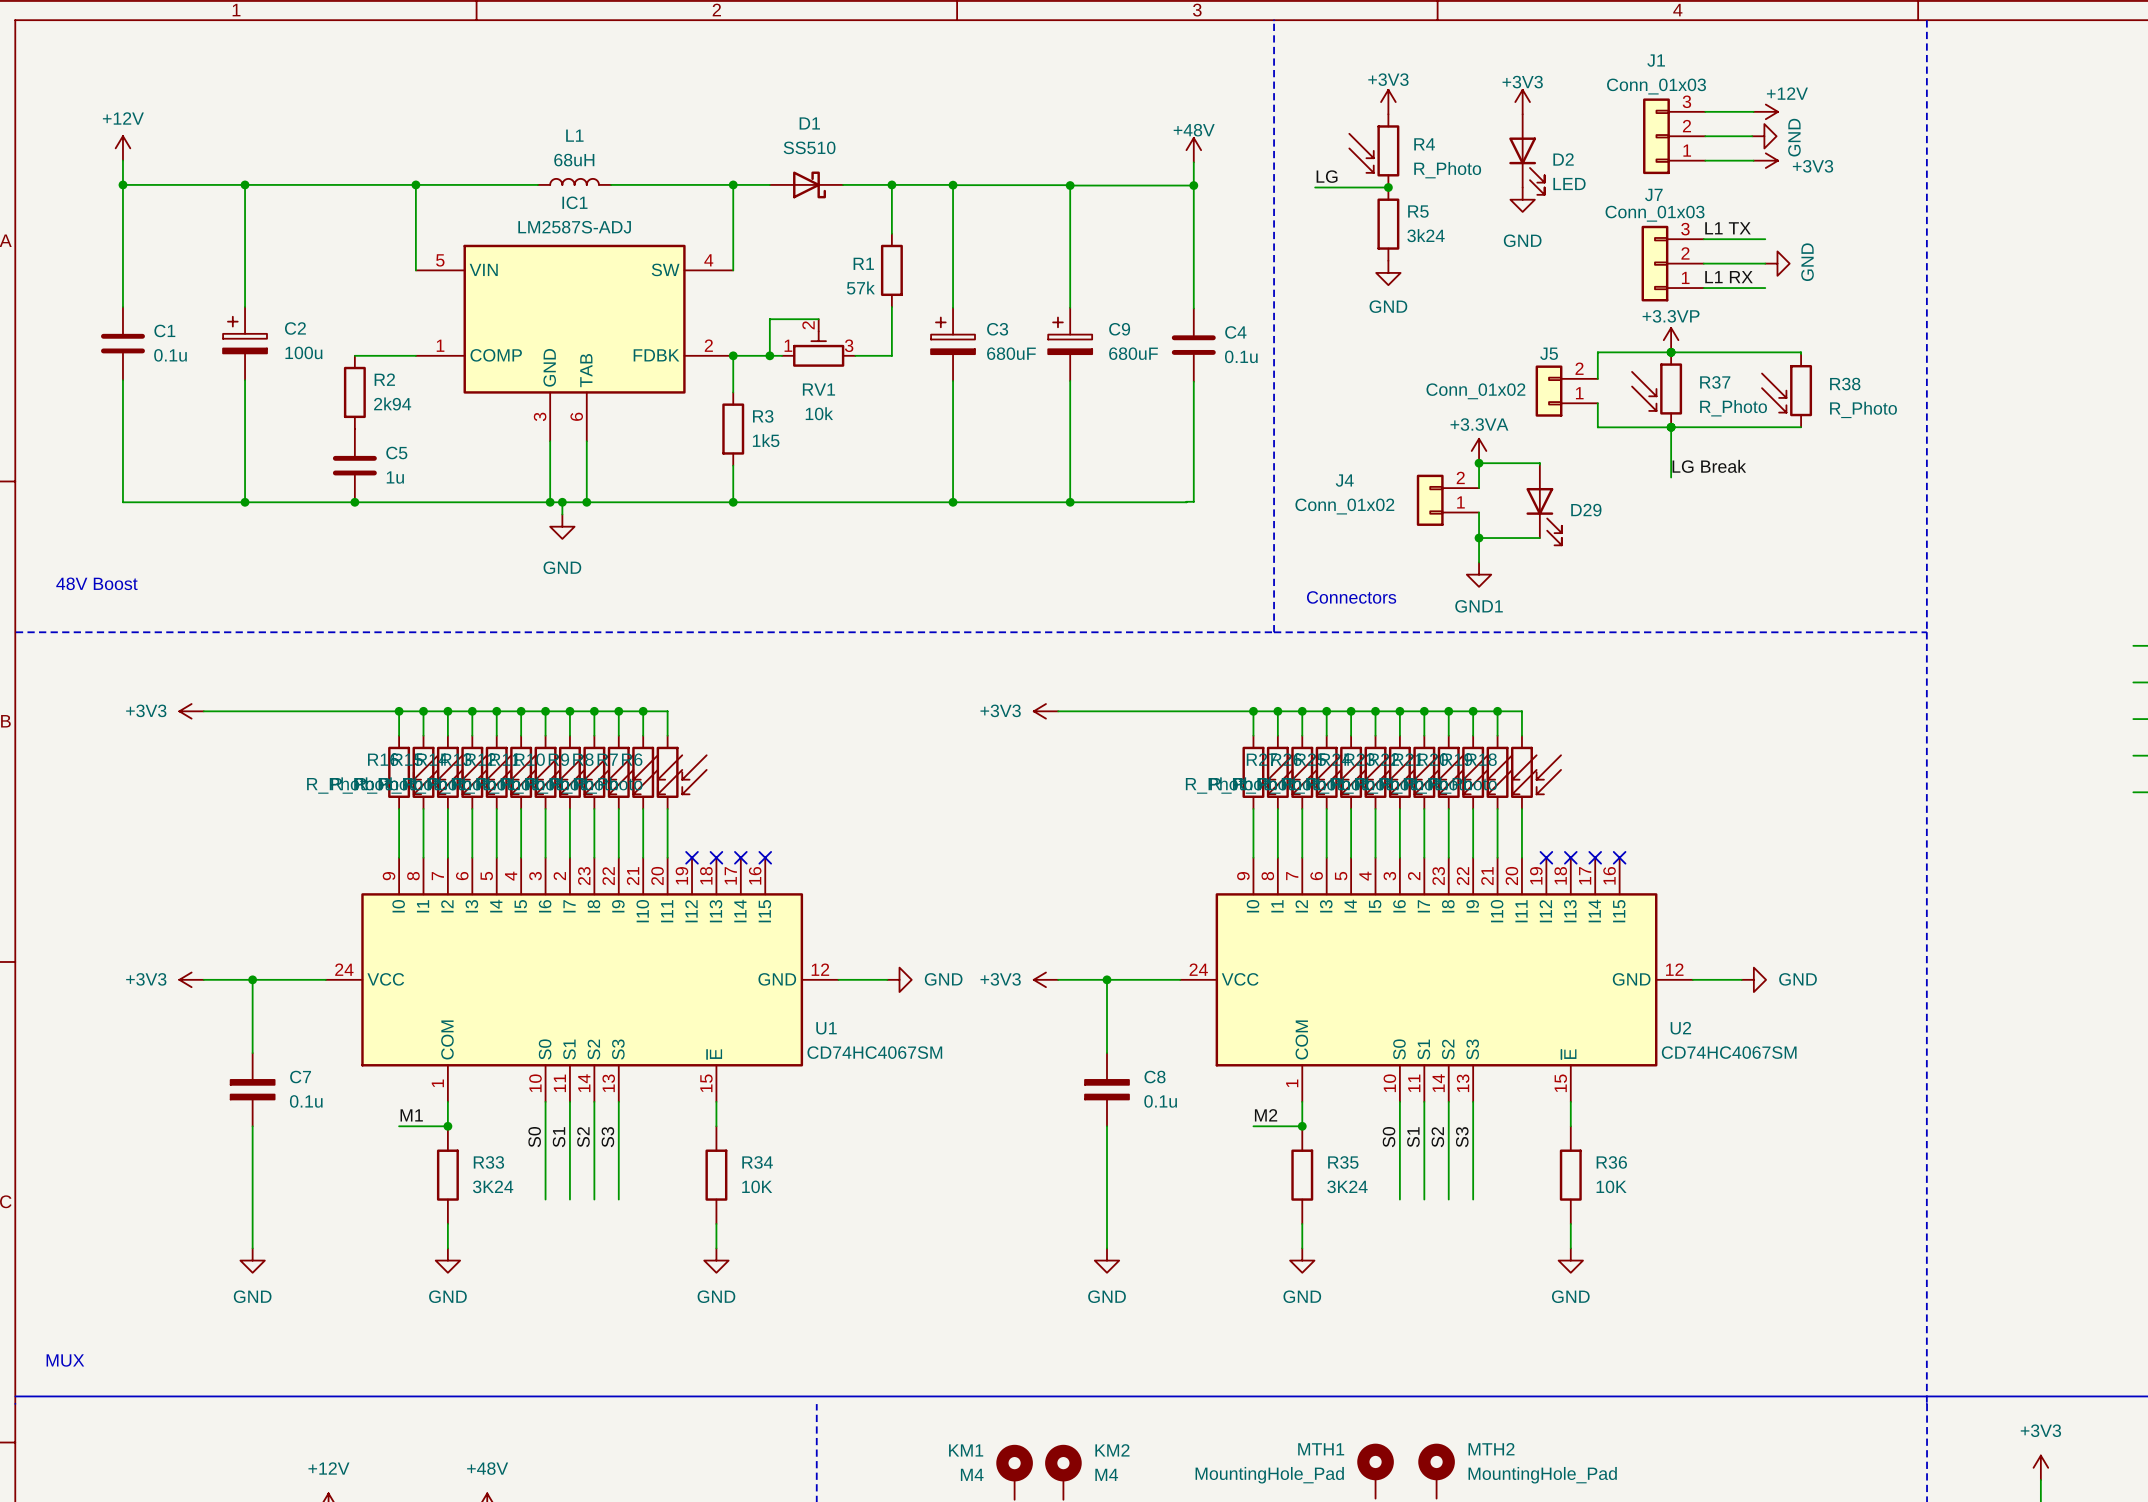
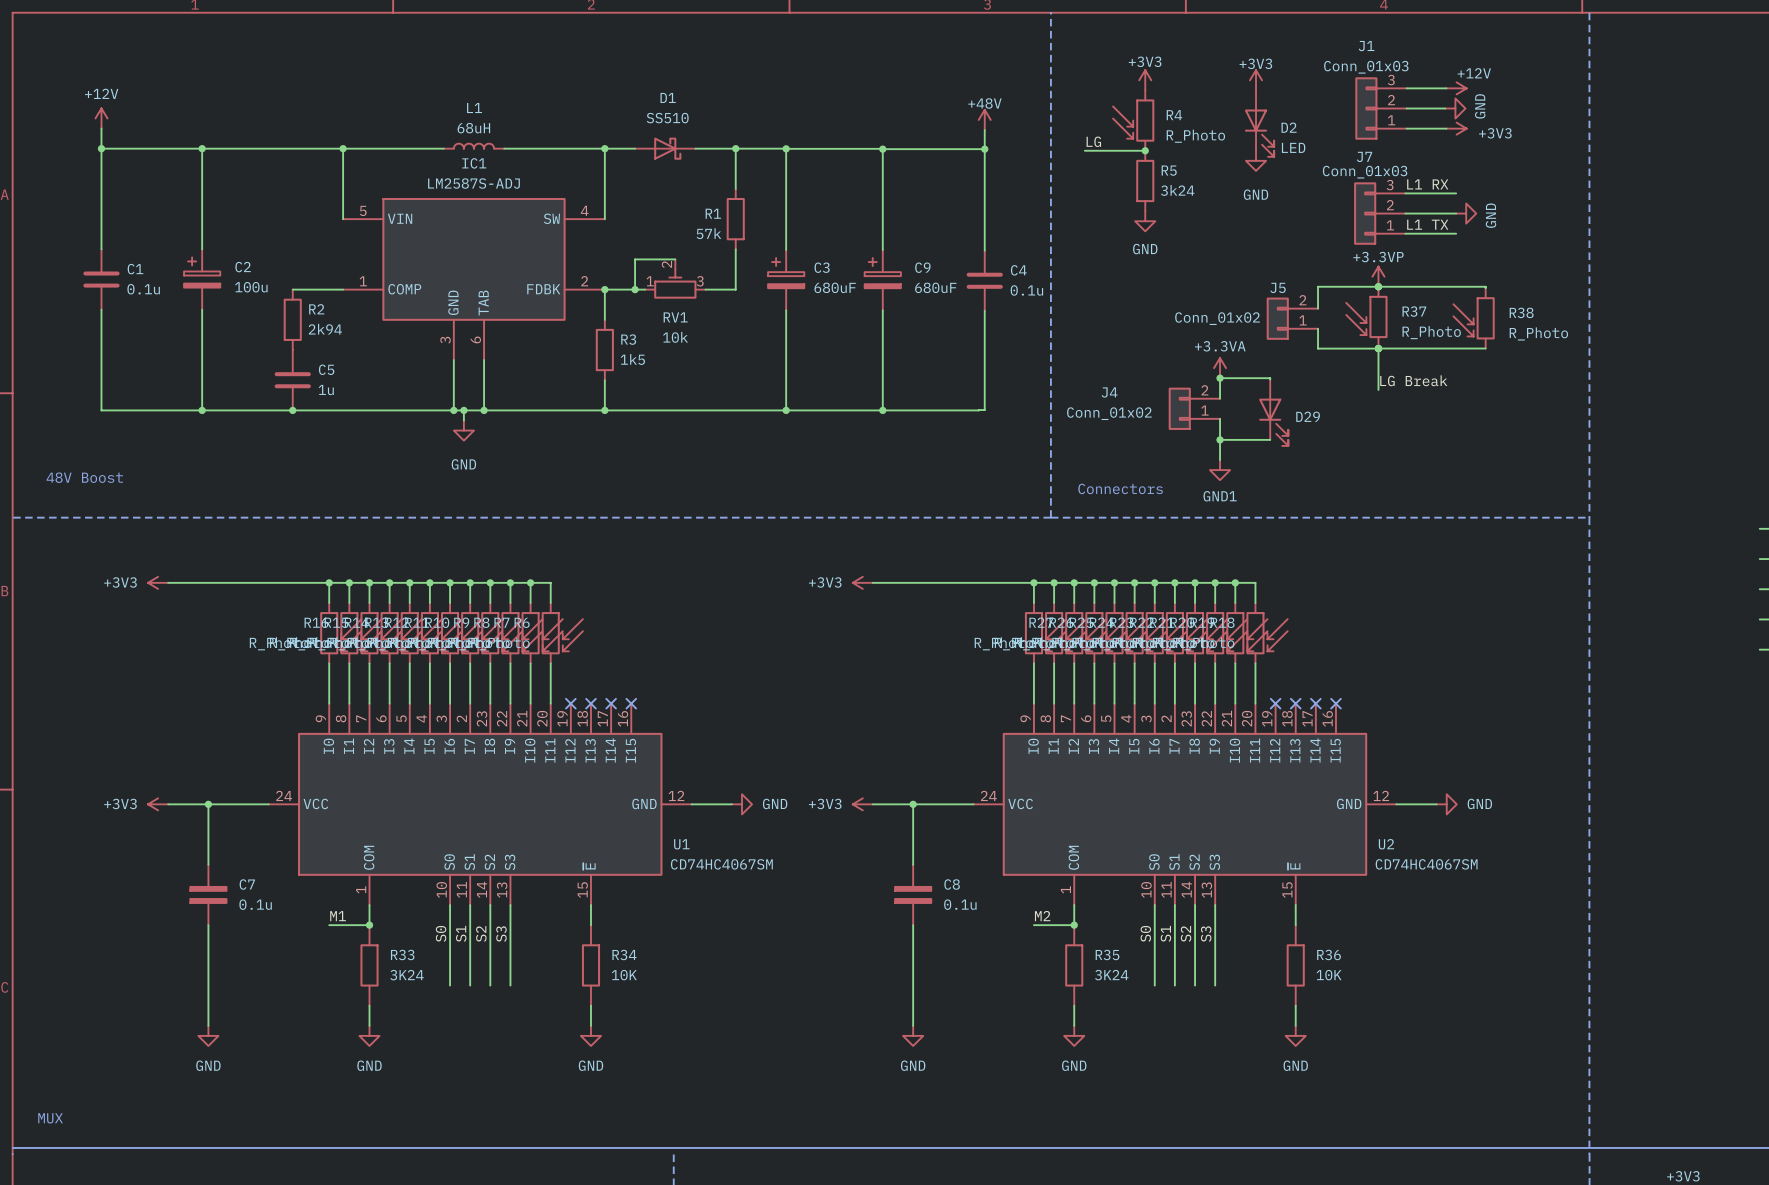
label: L1 TX (1728, 228) -> L1 RX (1427, 184)
label: L1 RX (1728, 277) -> L1 TX (1427, 224)

